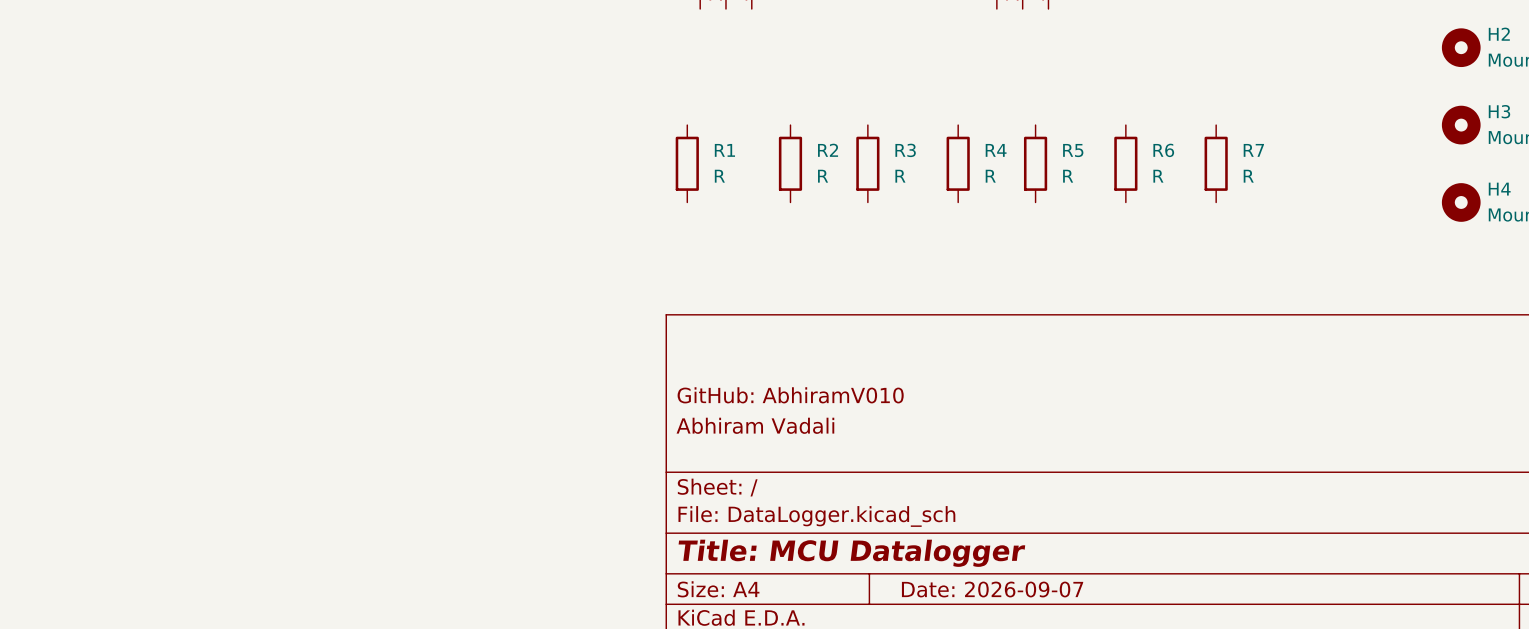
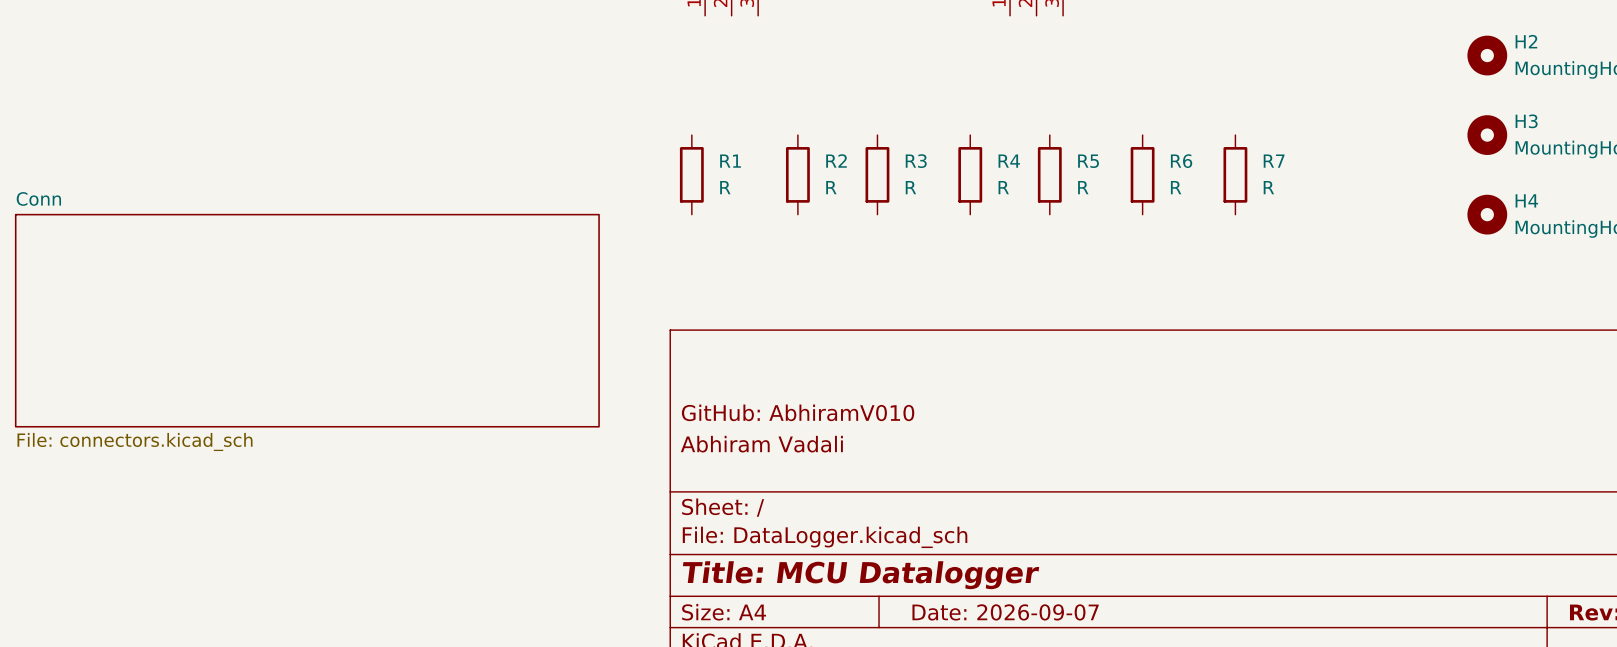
sheet Conn: none -> File: connectors.kicad_sch (307, 320)

